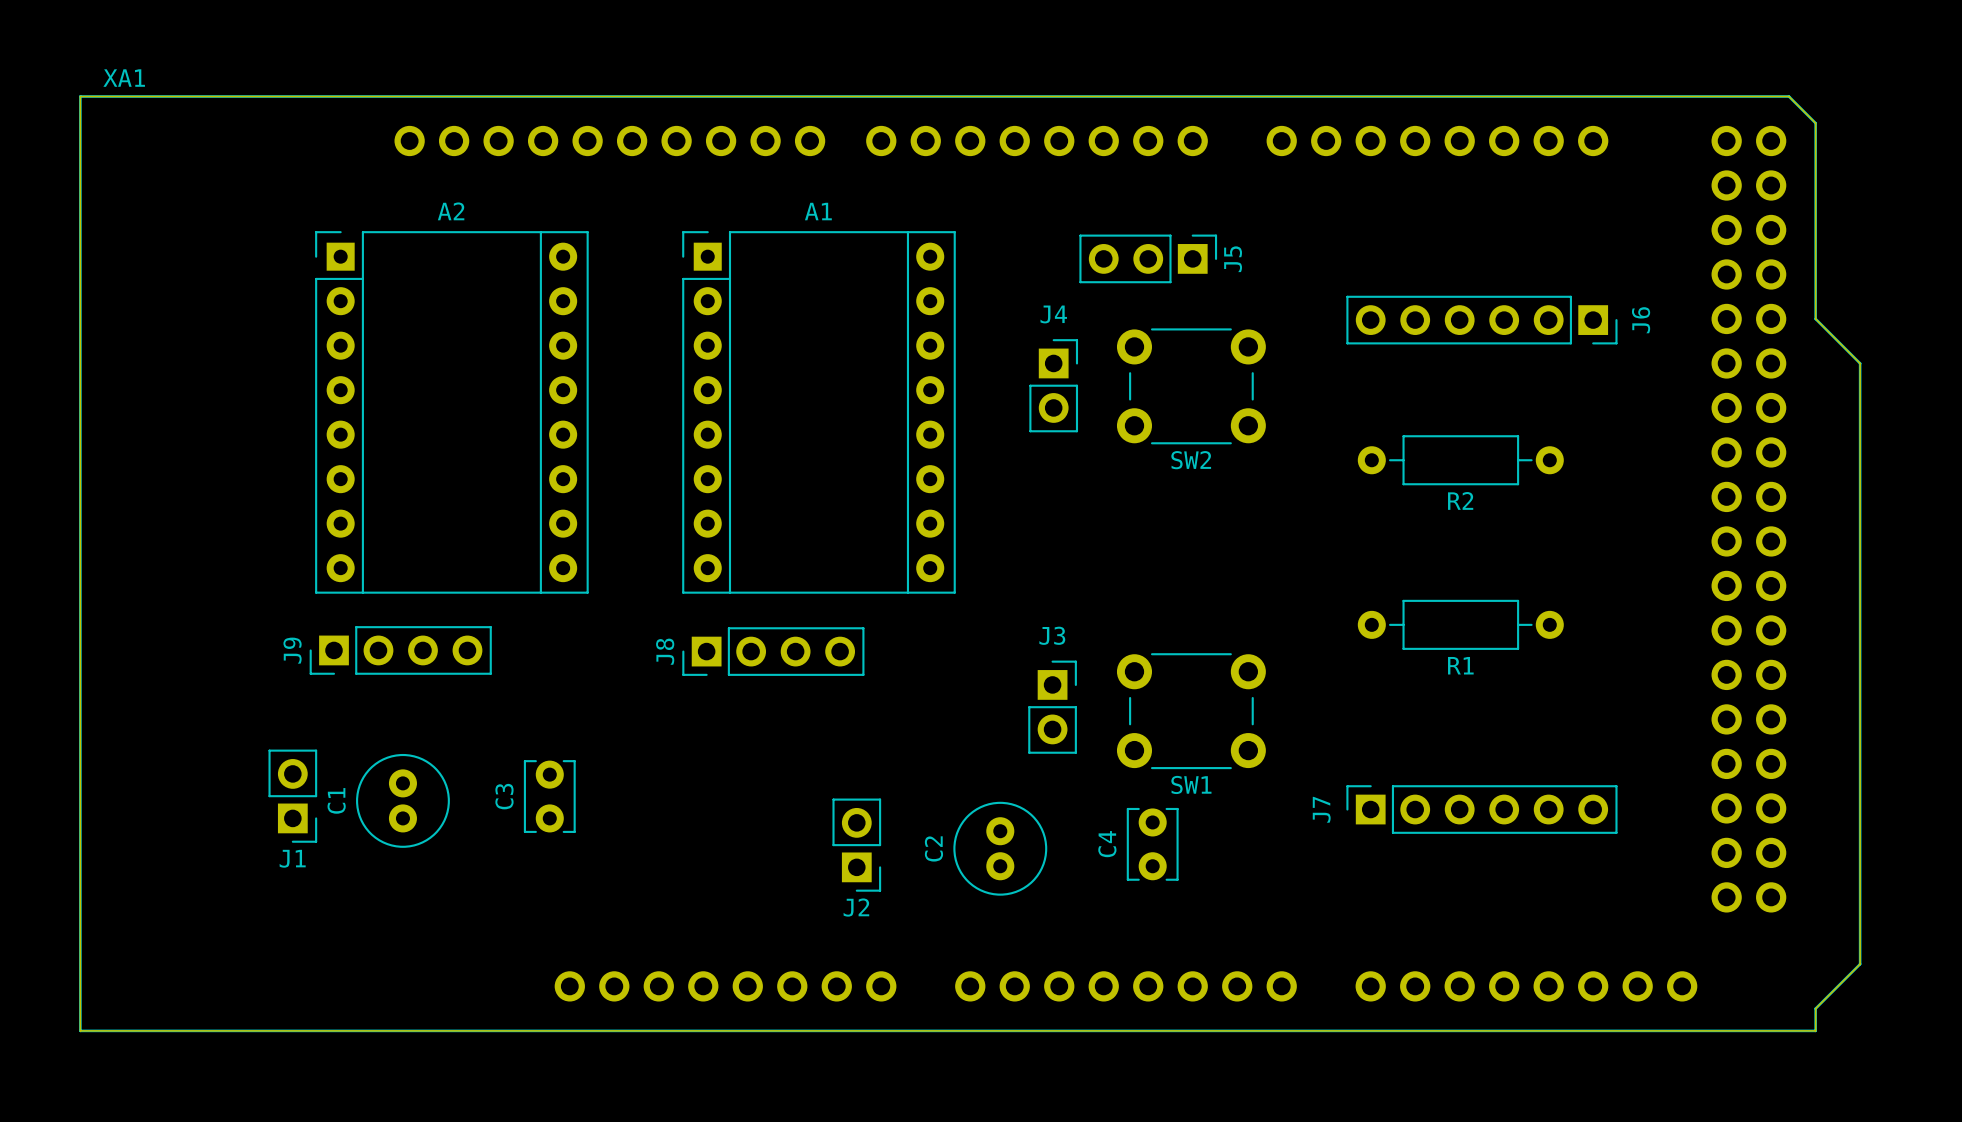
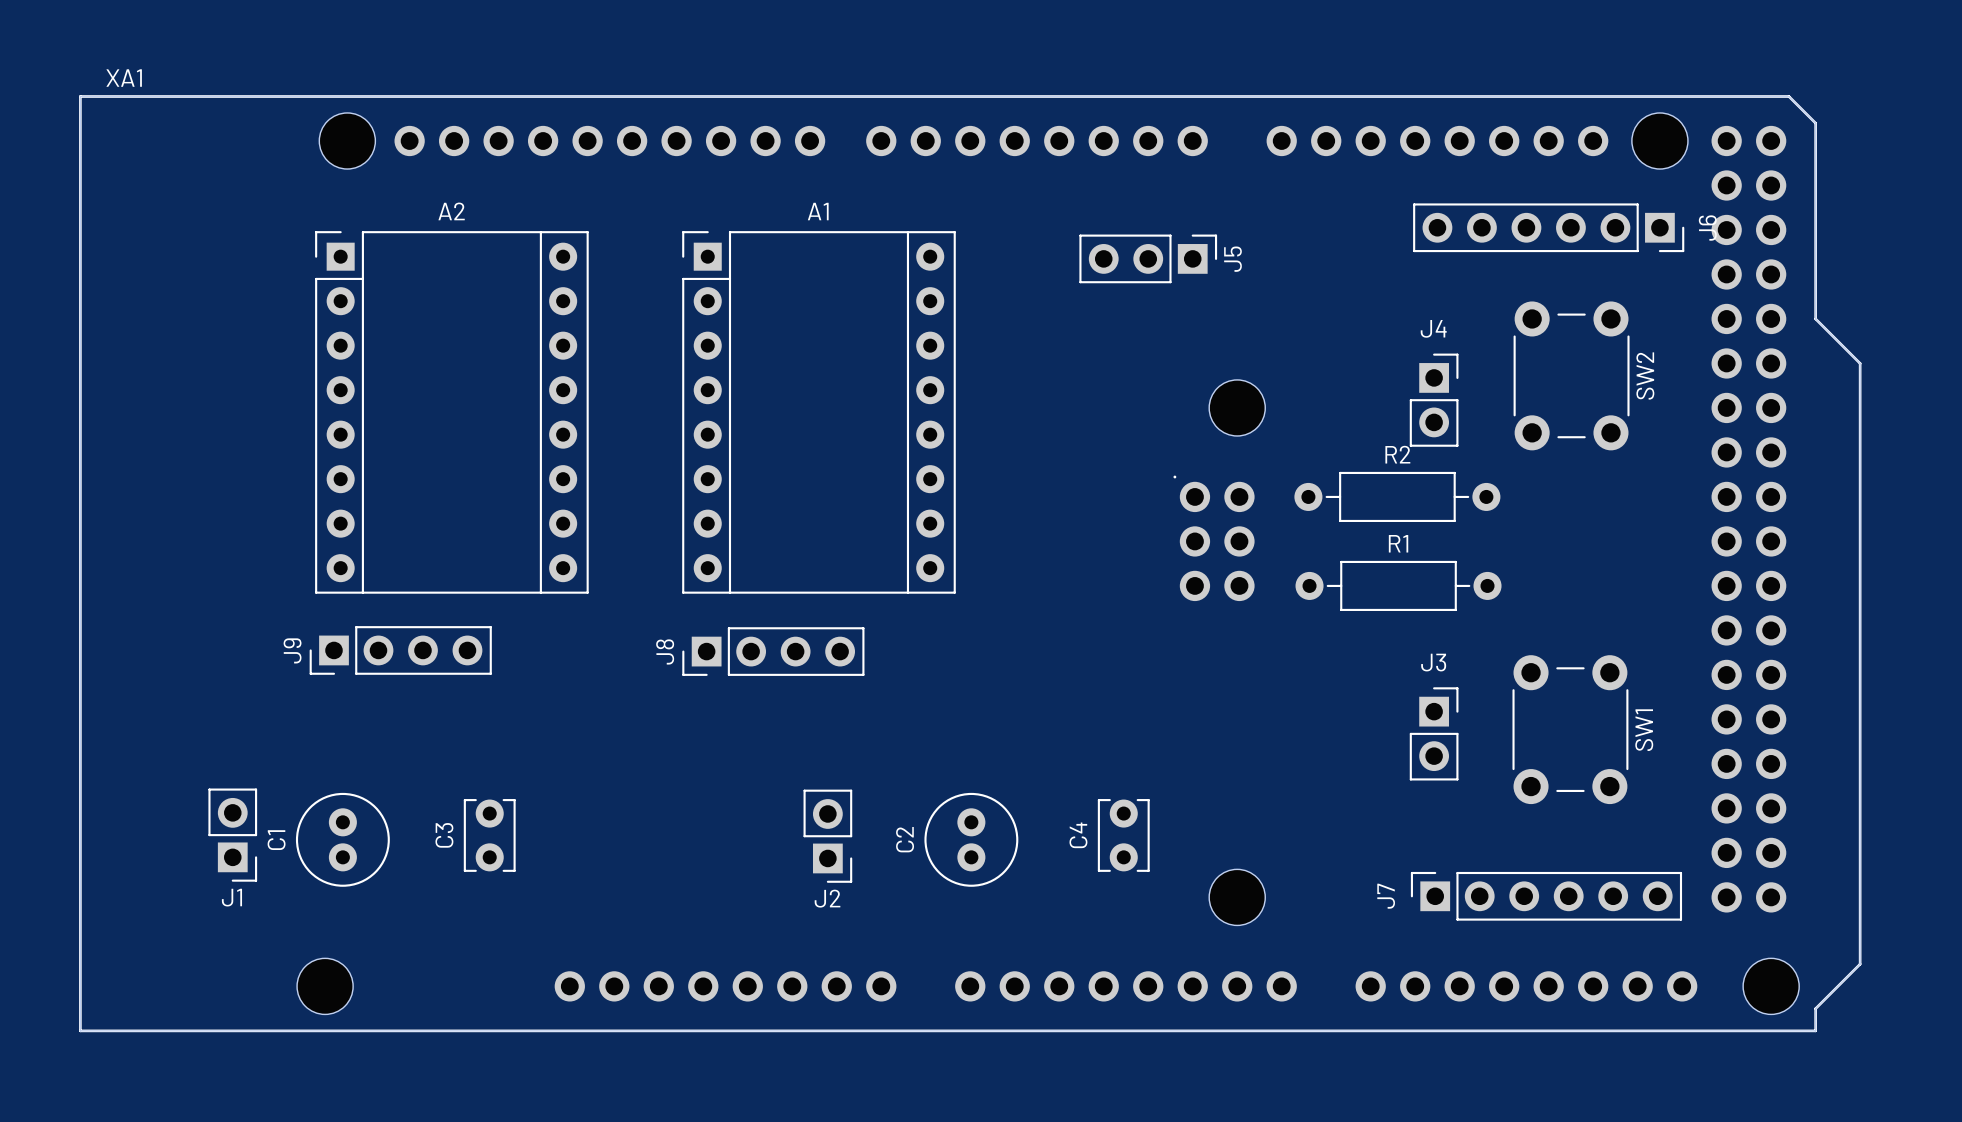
XA1 footprint: [79, 95, 1862, 1033] -> [79, 95, 1862, 1033]
J6 position: (1481, 320) -> (1548, 227)
J4 position: (1053, 385) -> (1434, 400)
SW2 rotation: 0° (1191, 386) -> 90° clockwise (1571, 375)
SW2 position: (1191, 386) -> (1571, 375)
SW2 name position: SW2 (1191, 460) -> SW2 (1645, 375)
R2 position: (1460, 460) -> (1397, 496)
R2 name position: R2 (1460, 500) -> R2 (1397, 454)
R1 position: (1460, 624) -> (1398, 585)
R1 name position: R1 (1460, 665) -> R1 (1398, 543)
J3 position: (1052, 707) -> (1434, 733)
SW1 rotation: 0° (1191, 711) -> 90° clockwise (1570, 729)
SW1 position: (1191, 711) -> (1570, 729)
SW1 name position: SW1 (1191, 784) -> SW1 (1644, 730)
J1 position: (292, 796) -> (232, 835)
C3 position: (549, 796) -> (489, 835)
C1 position: (402, 800) -> (342, 839)
J7 position: (1481, 809) -> (1546, 896)
C4 position: (1152, 844) -> (1123, 835)
J2 position: (856, 845) -> (827, 836)
C2 position: (1000, 848) -> (971, 839)

